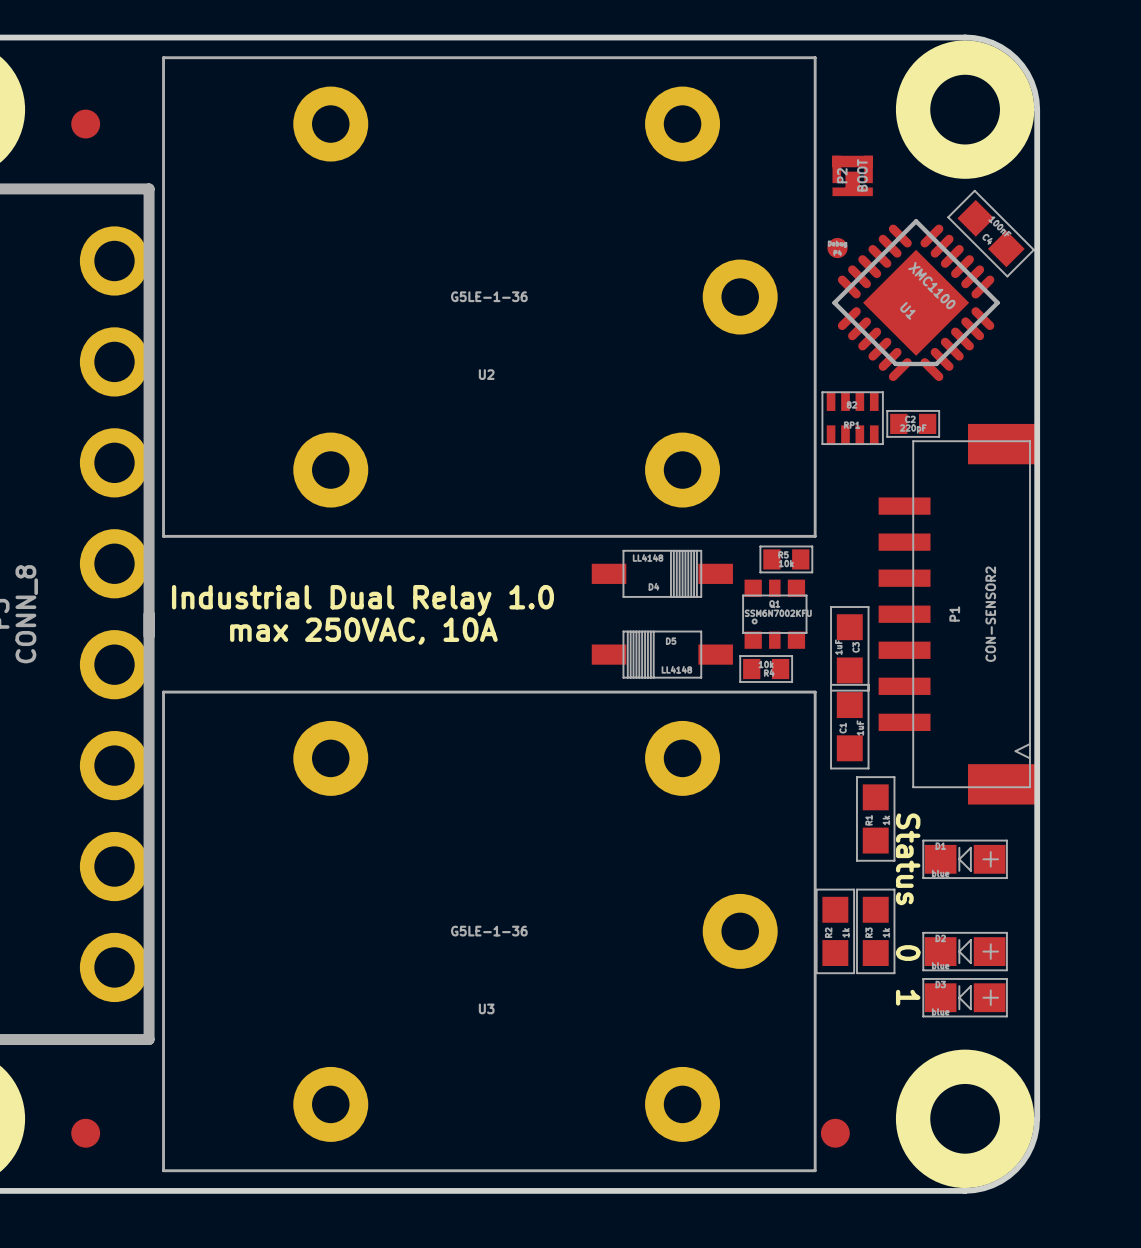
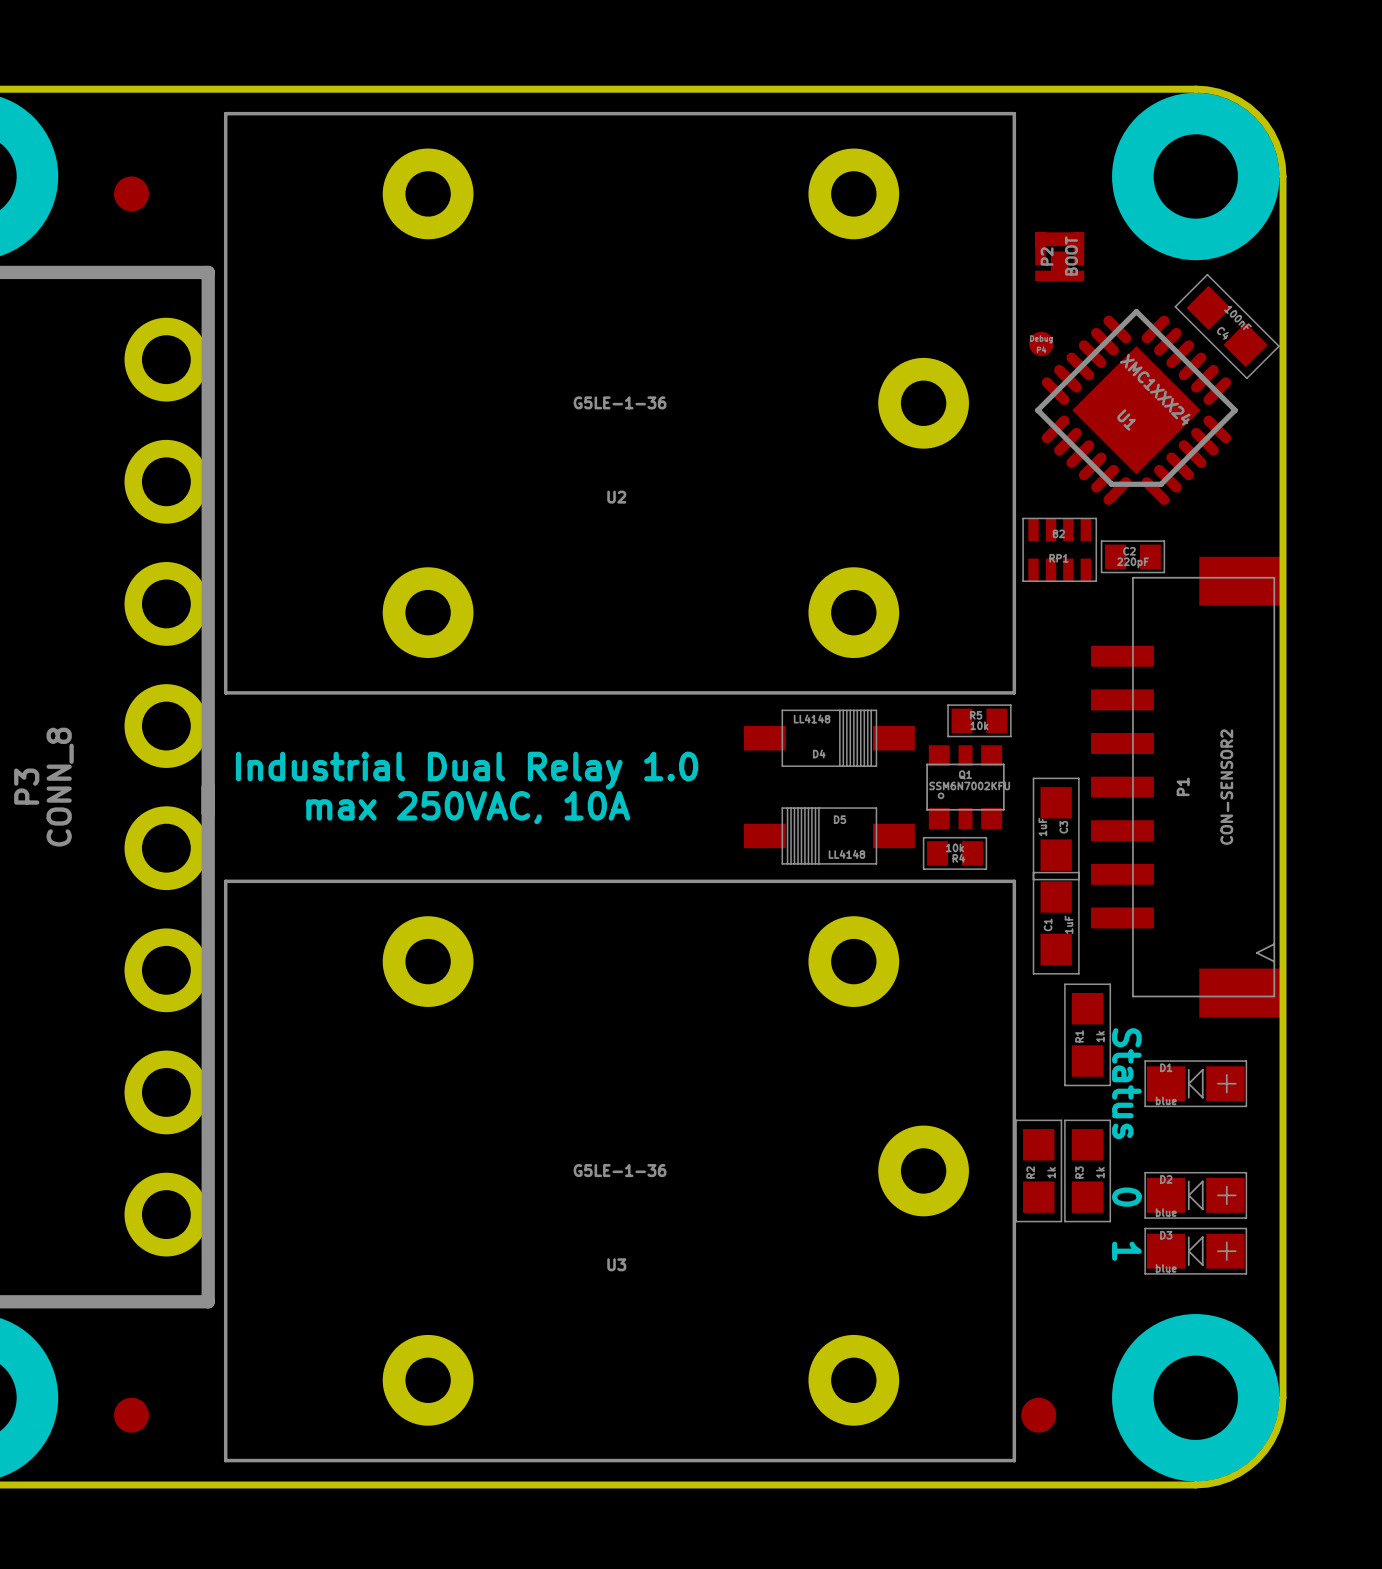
U1 value: XMC1100 (931, 285) -> XMC1XXX24 (1155, 389)

